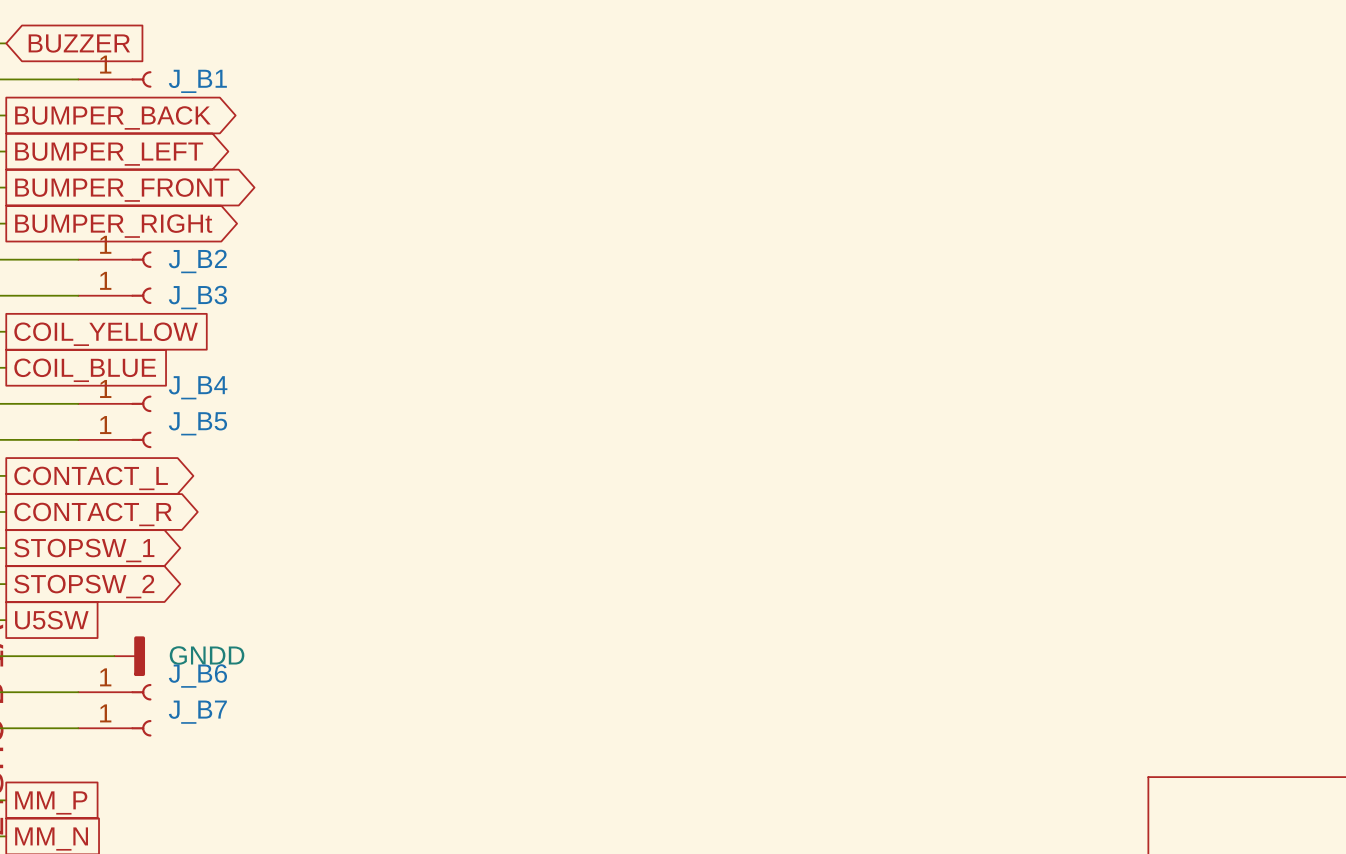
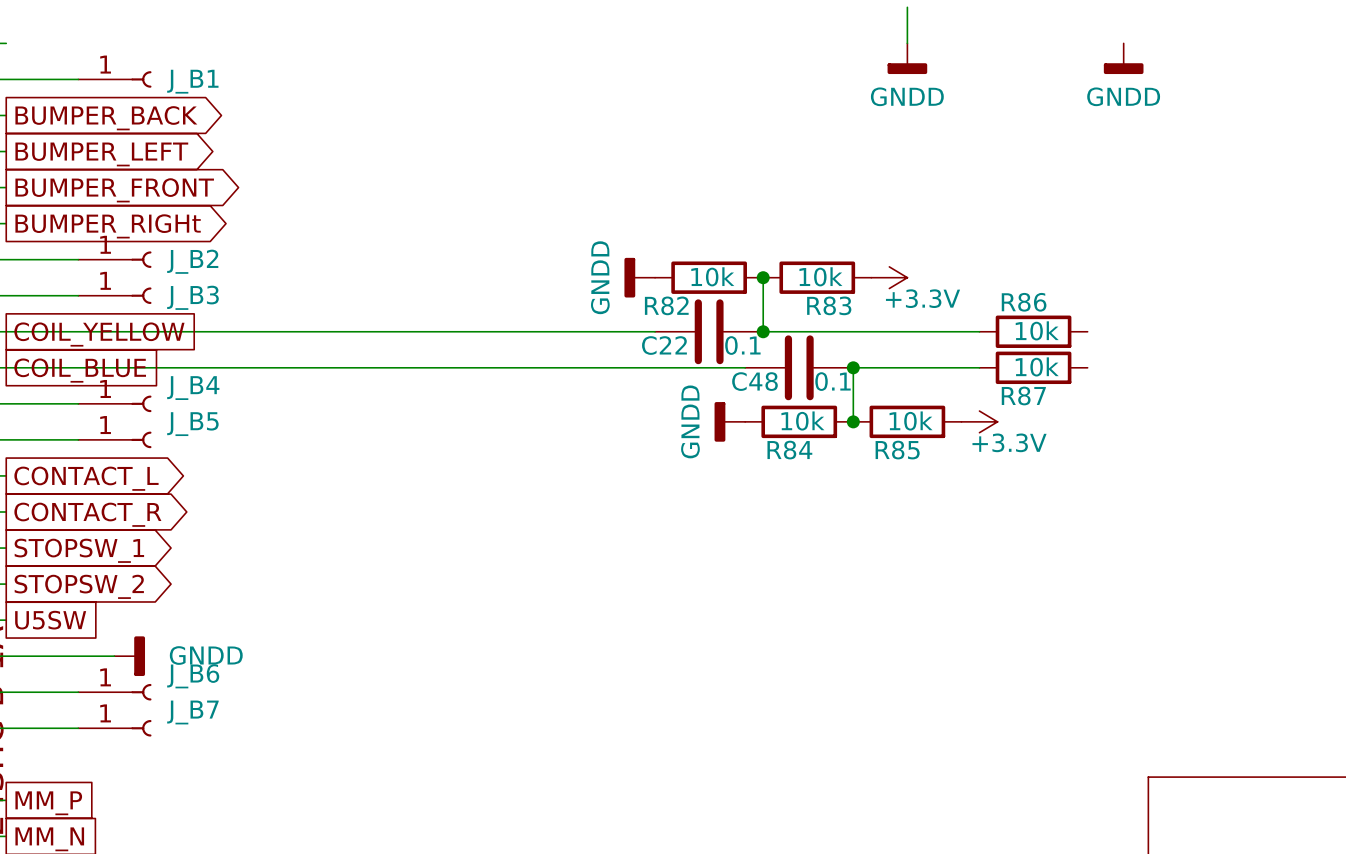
wire: none -> (907, 7) (907, 43)
global label: BUZZER (79, 43) -> none
power symbol: none -> GNDD (907, 58)
power symbol: none -> GNDD (1123, 58)
power symbol: none -> GNDD (639, 277)
R82: none -> 10k (709, 277)
wire: none -> (763, 277) (763, 331) (979, 331)
junction: none -> (763, 277)
R83: none -> 10k (817, 277)
power symbol: none -> +3.3V (889, 277)
wire: none -> (6, 331) (655, 331)
C22: none -> 0.1 (709, 331)
junction: none -> (763, 331)
R86: none -> 10k (1033, 331)
wire: none -> (6, 367) (745, 367)
C48: none -> 0.1 (799, 367)
junction: none -> (853, 367)
wire: none -> (979, 367) (853, 367) (853, 421)
R87: none -> 10k (1033, 367)
power symbol: none -> GNDD (729, 421)
R84: none -> 10k (799, 421)
junction: none -> (853, 421)
R85: none -> 10k (907, 421)
power symbol: none -> +3.3V (979, 421)

